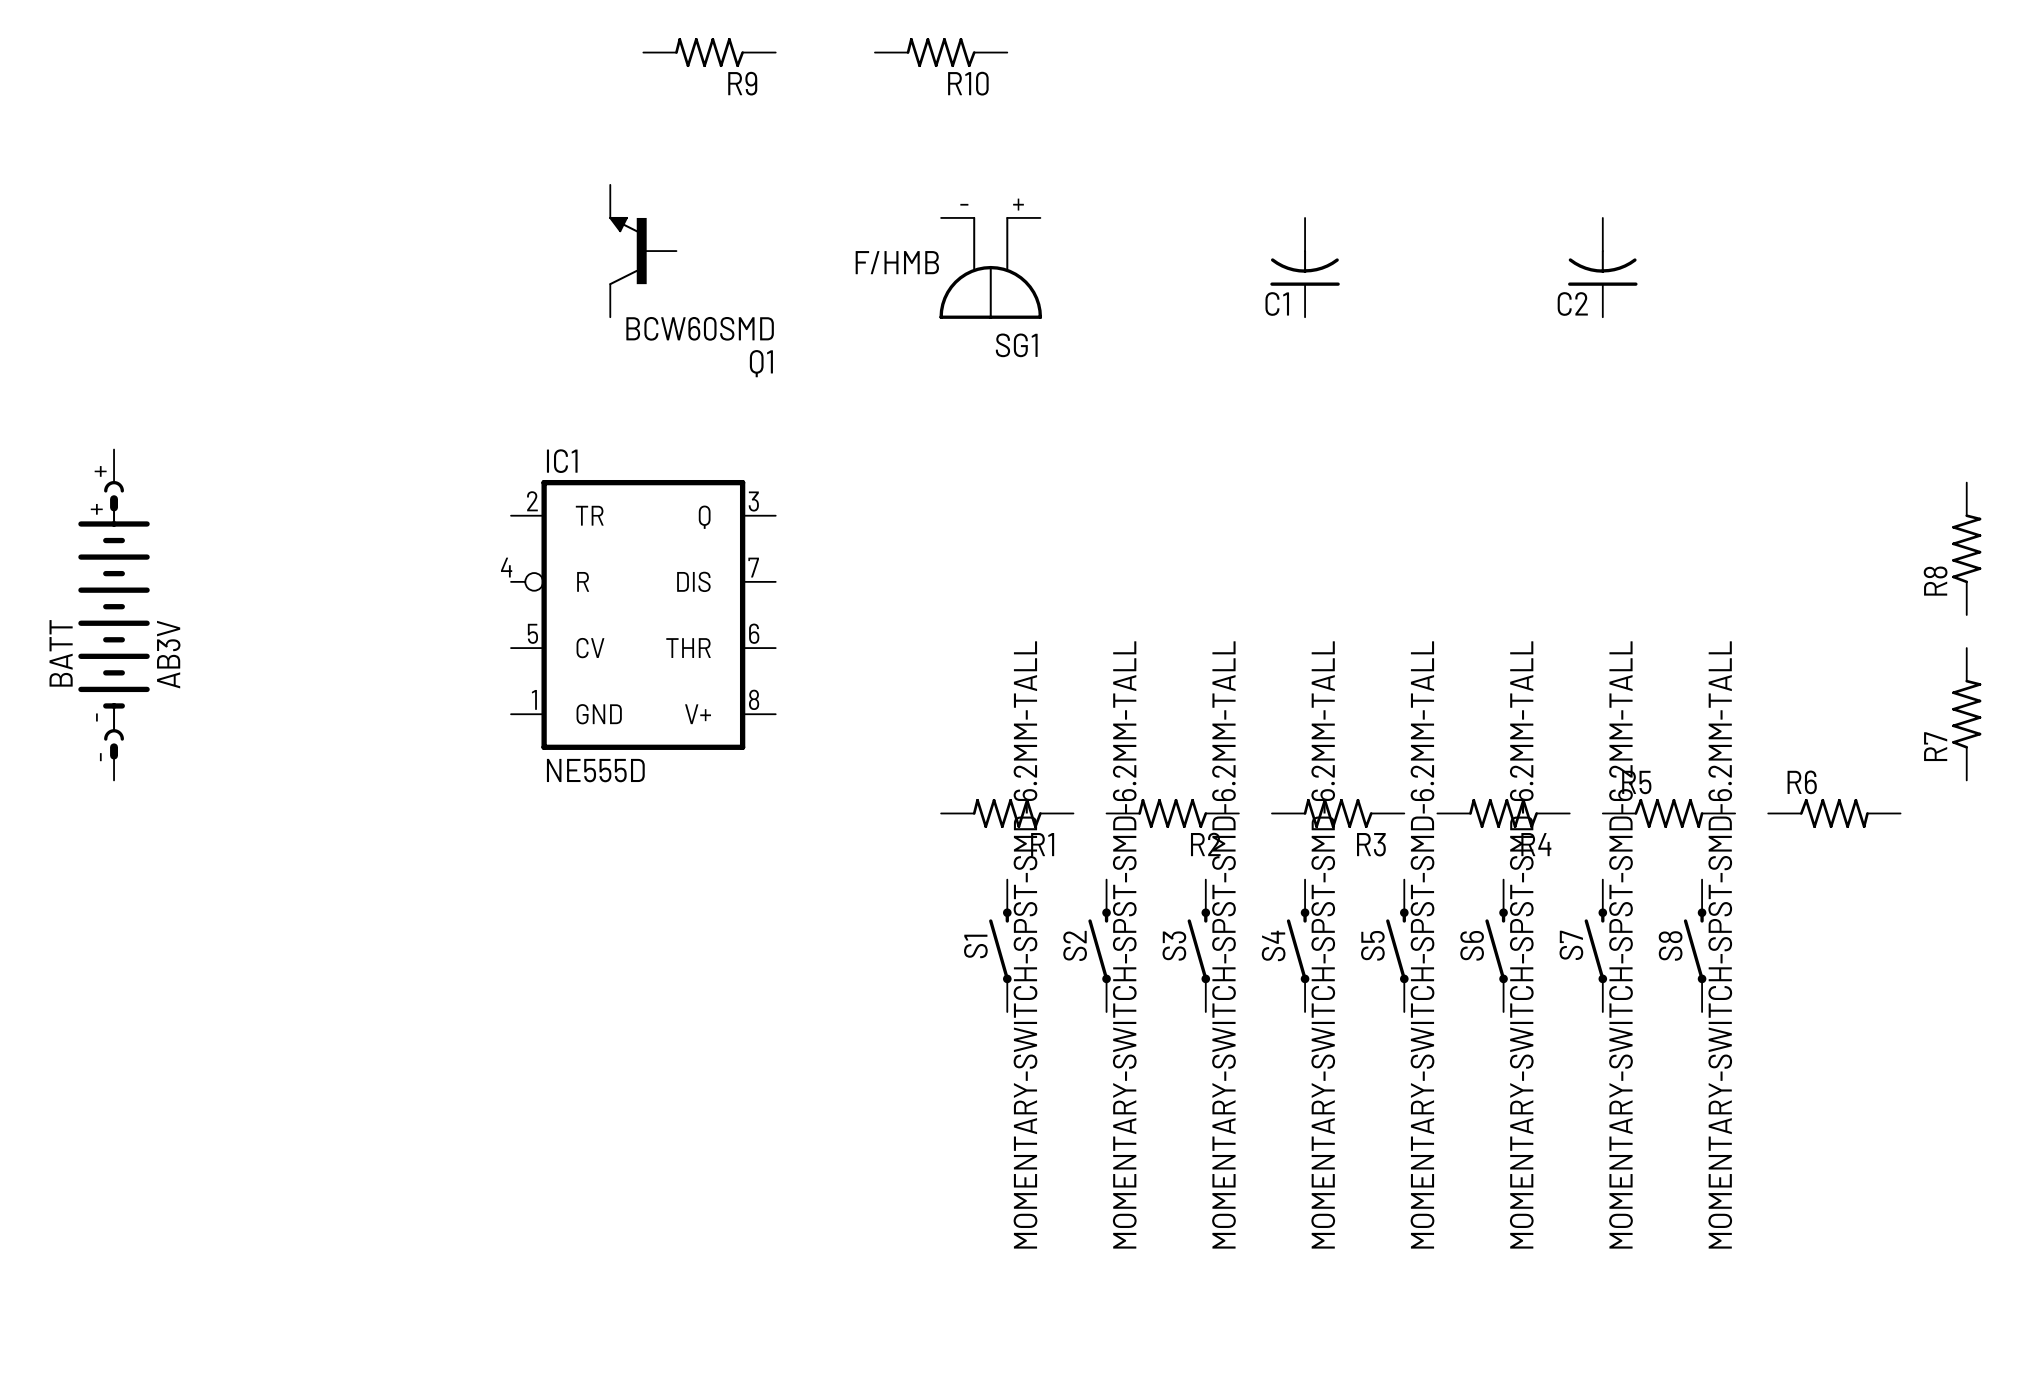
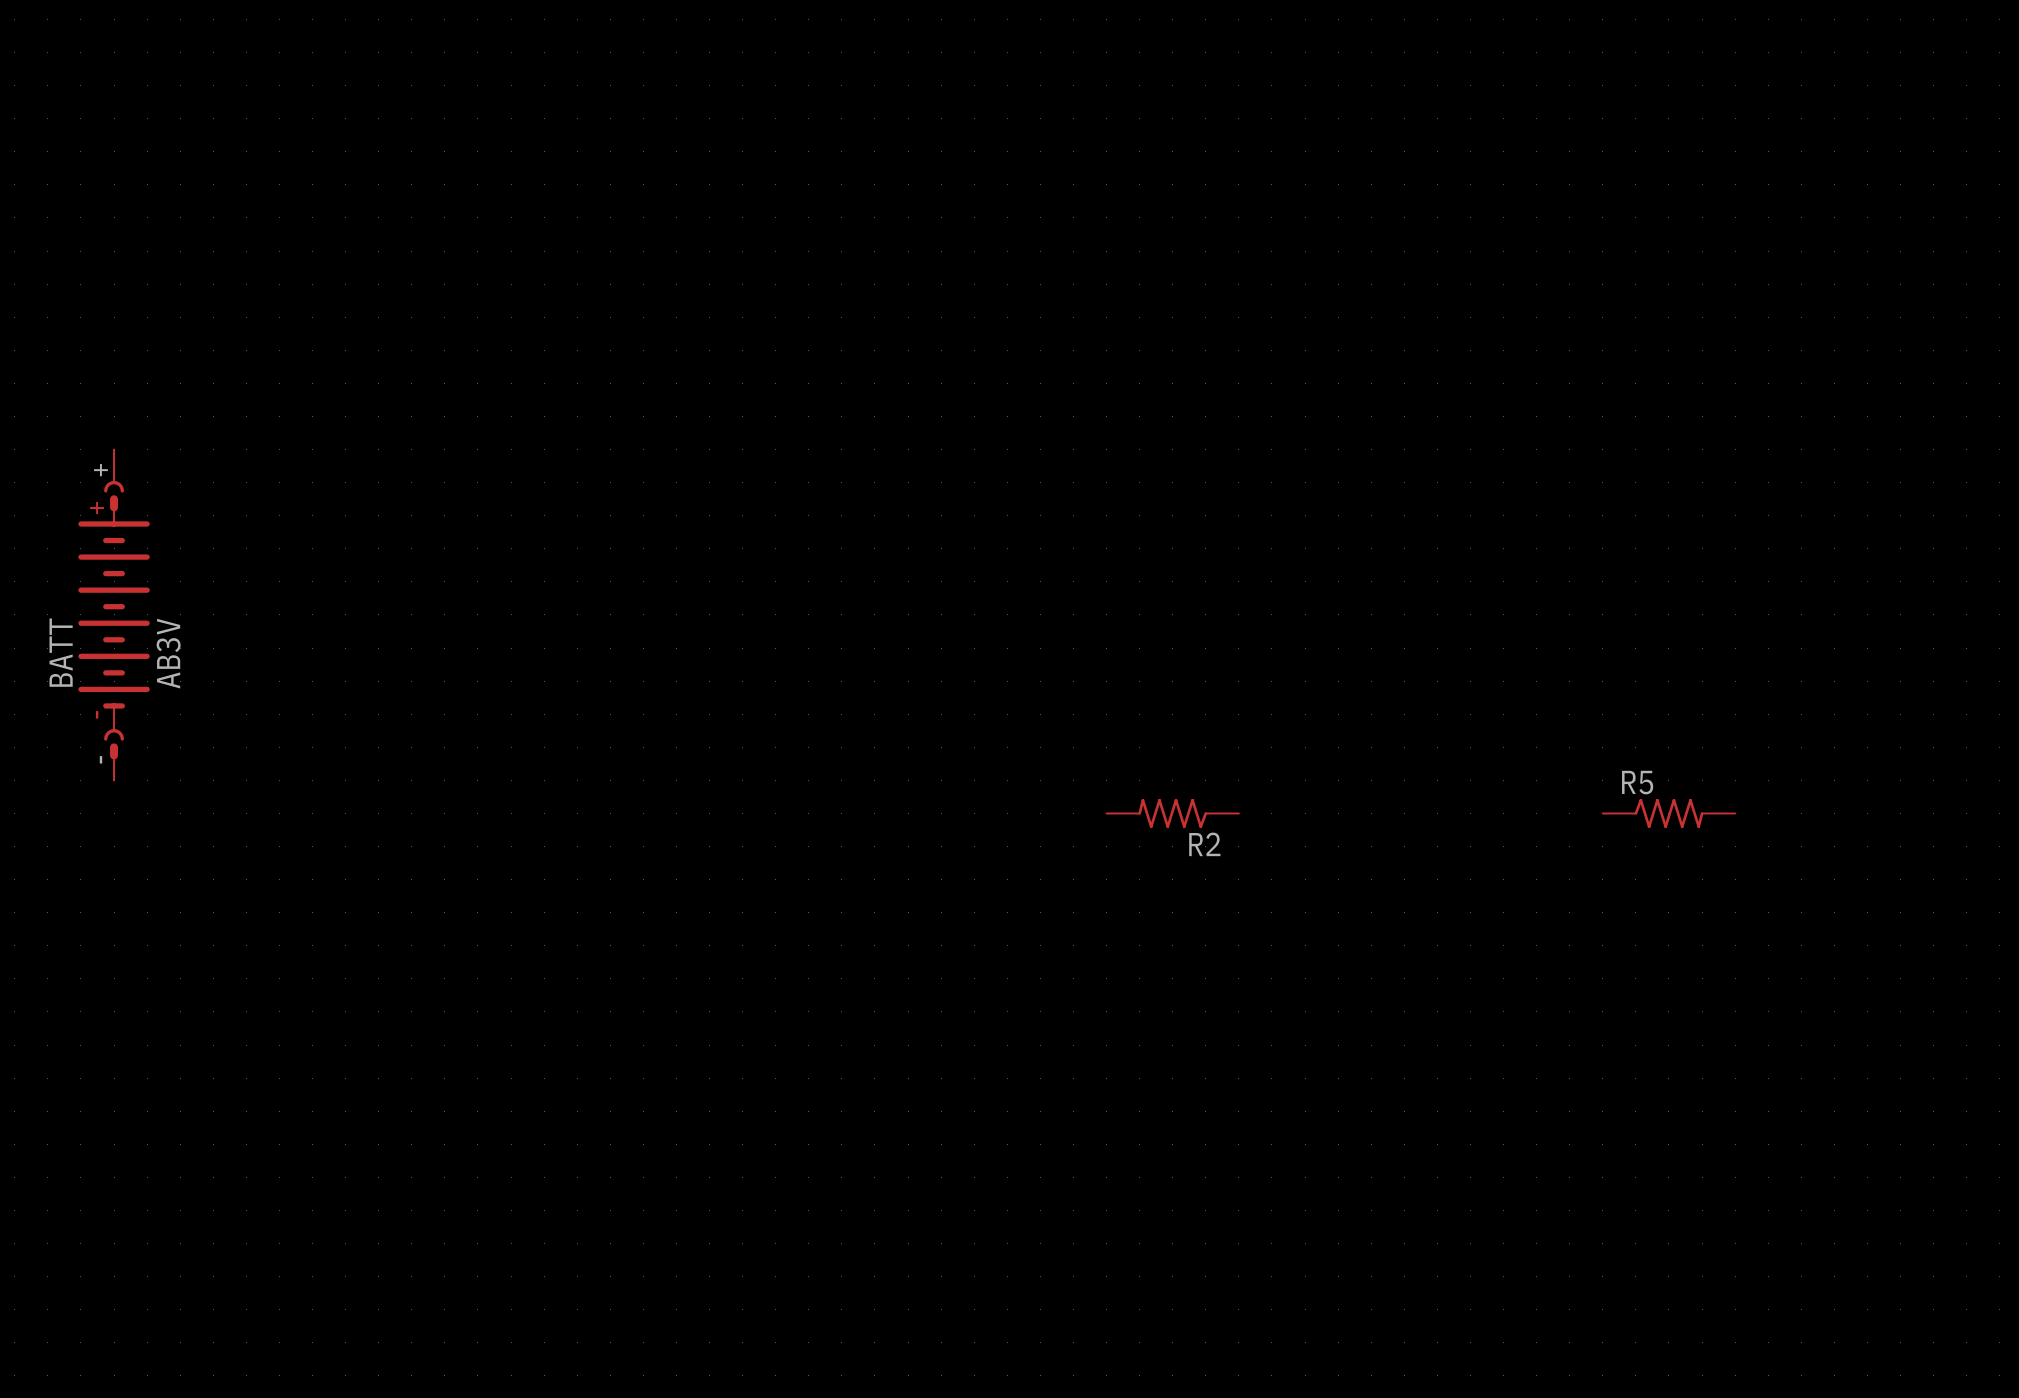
R9: (709, 52) -> none
R10: (941, 52) -> none
Q1: BCW60SMD (642, 251) -> none
SG1: F/HMB (990, 267) -> none
C1: (1305, 267) -> none
C2: (1602, 267) -> none
R8: (1966, 548) -> none
IC1: NE555D (643, 614) -> none
R7: (1966, 714) -> none
R1: (1007, 813) -> none
R3: (1338, 813) -> none
R4: (1503, 813) -> none
R6: (1834, 813) -> none
S1: MOMENTARY-SWITCH-SPST-SMD-6.2MM-TALL (1000, 945) -> none
S2: MOMENTARY-SWITCH-SPST-SMD-6.2MM-TALL (1099, 945) -> none
S3: MOMENTARY-SWITCH-SPST-SMD-6.2MM-TALL (1198, 945) -> none
S4: MOMENTARY-SWITCH-SPST-SMD-6.2MM-TALL (1298, 945) -> none
S5: MOMENTARY-SWITCH-SPST-SMD-6.2MM-TALL (1397, 945) -> none
S6: MOMENTARY-SWITCH-SPST-SMD-6.2MM-TALL (1496, 945) -> none
S7: MOMENTARY-SWITCH-SPST-SMD-6.2MM-TALL (1595, 945) -> none
S8: MOMENTARY-SWITCH-SPST-SMD-6.2MM-TALL (1695, 945) -> none

